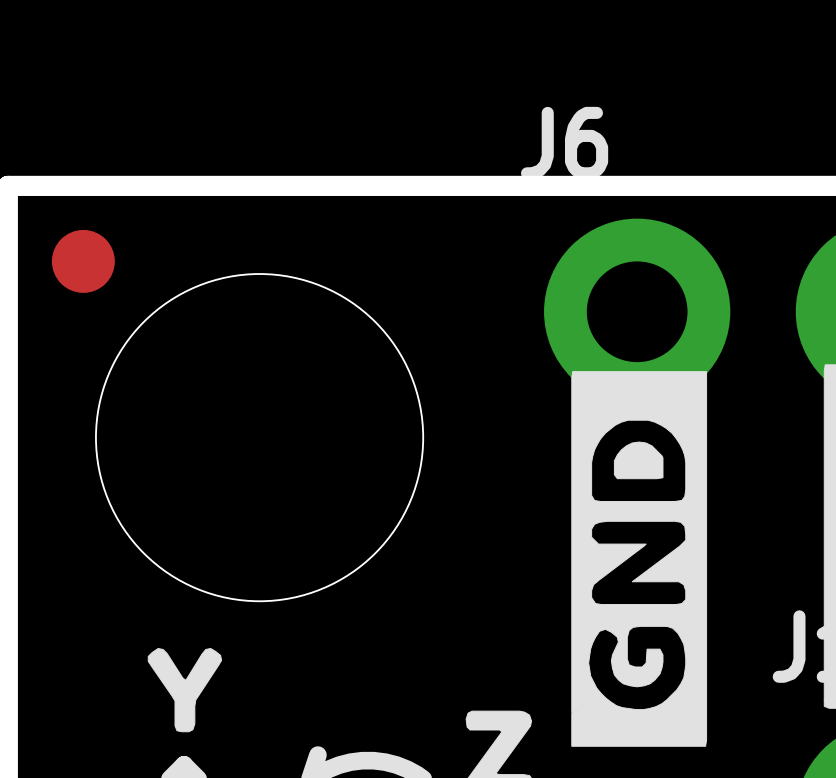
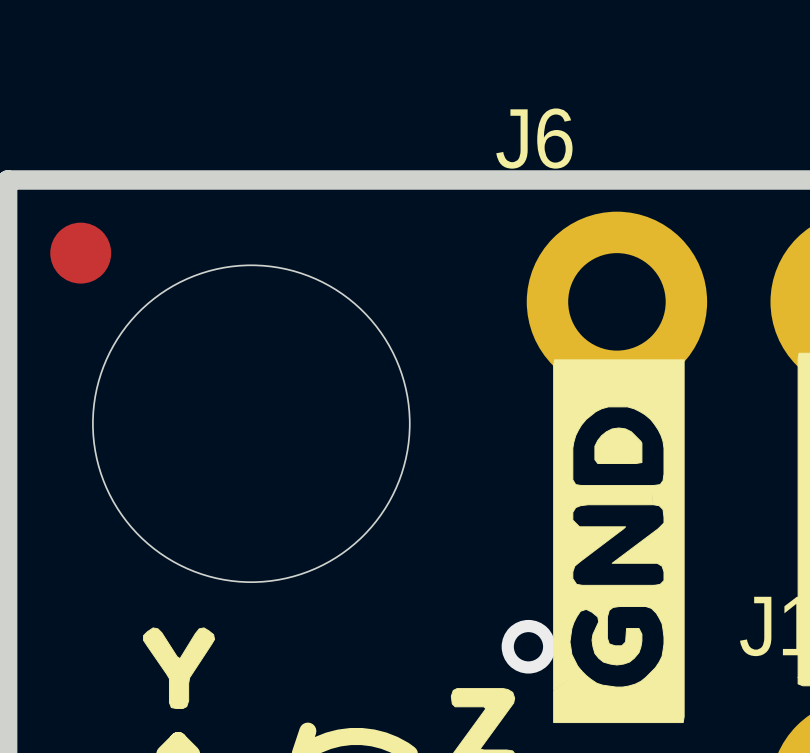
via: none -> (528, 646)

